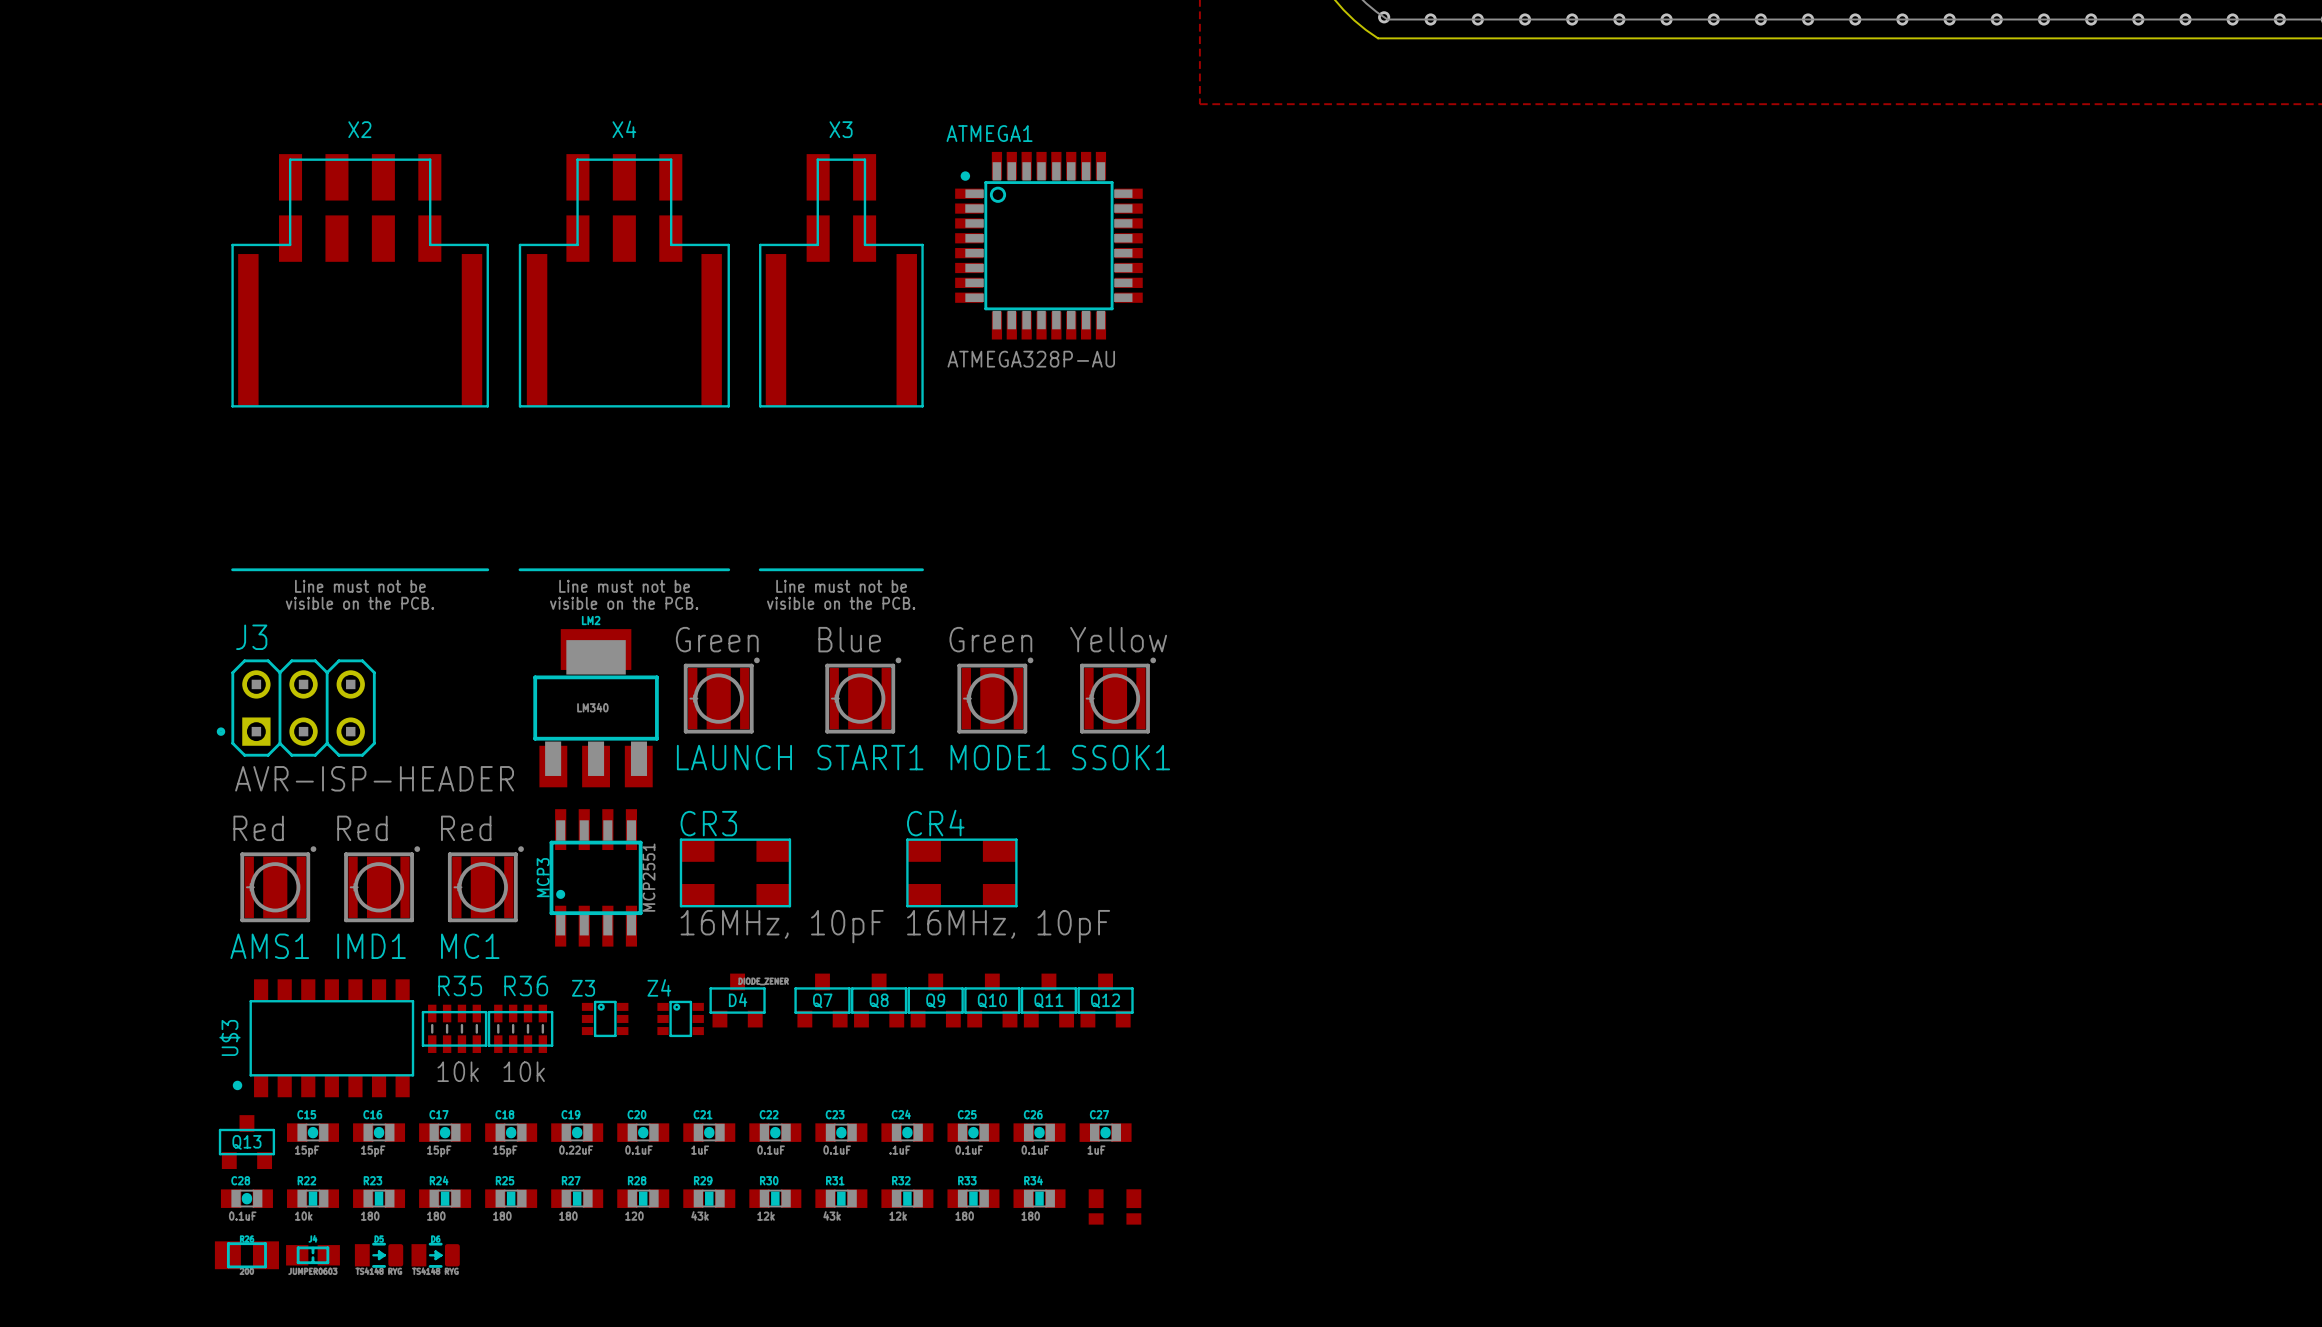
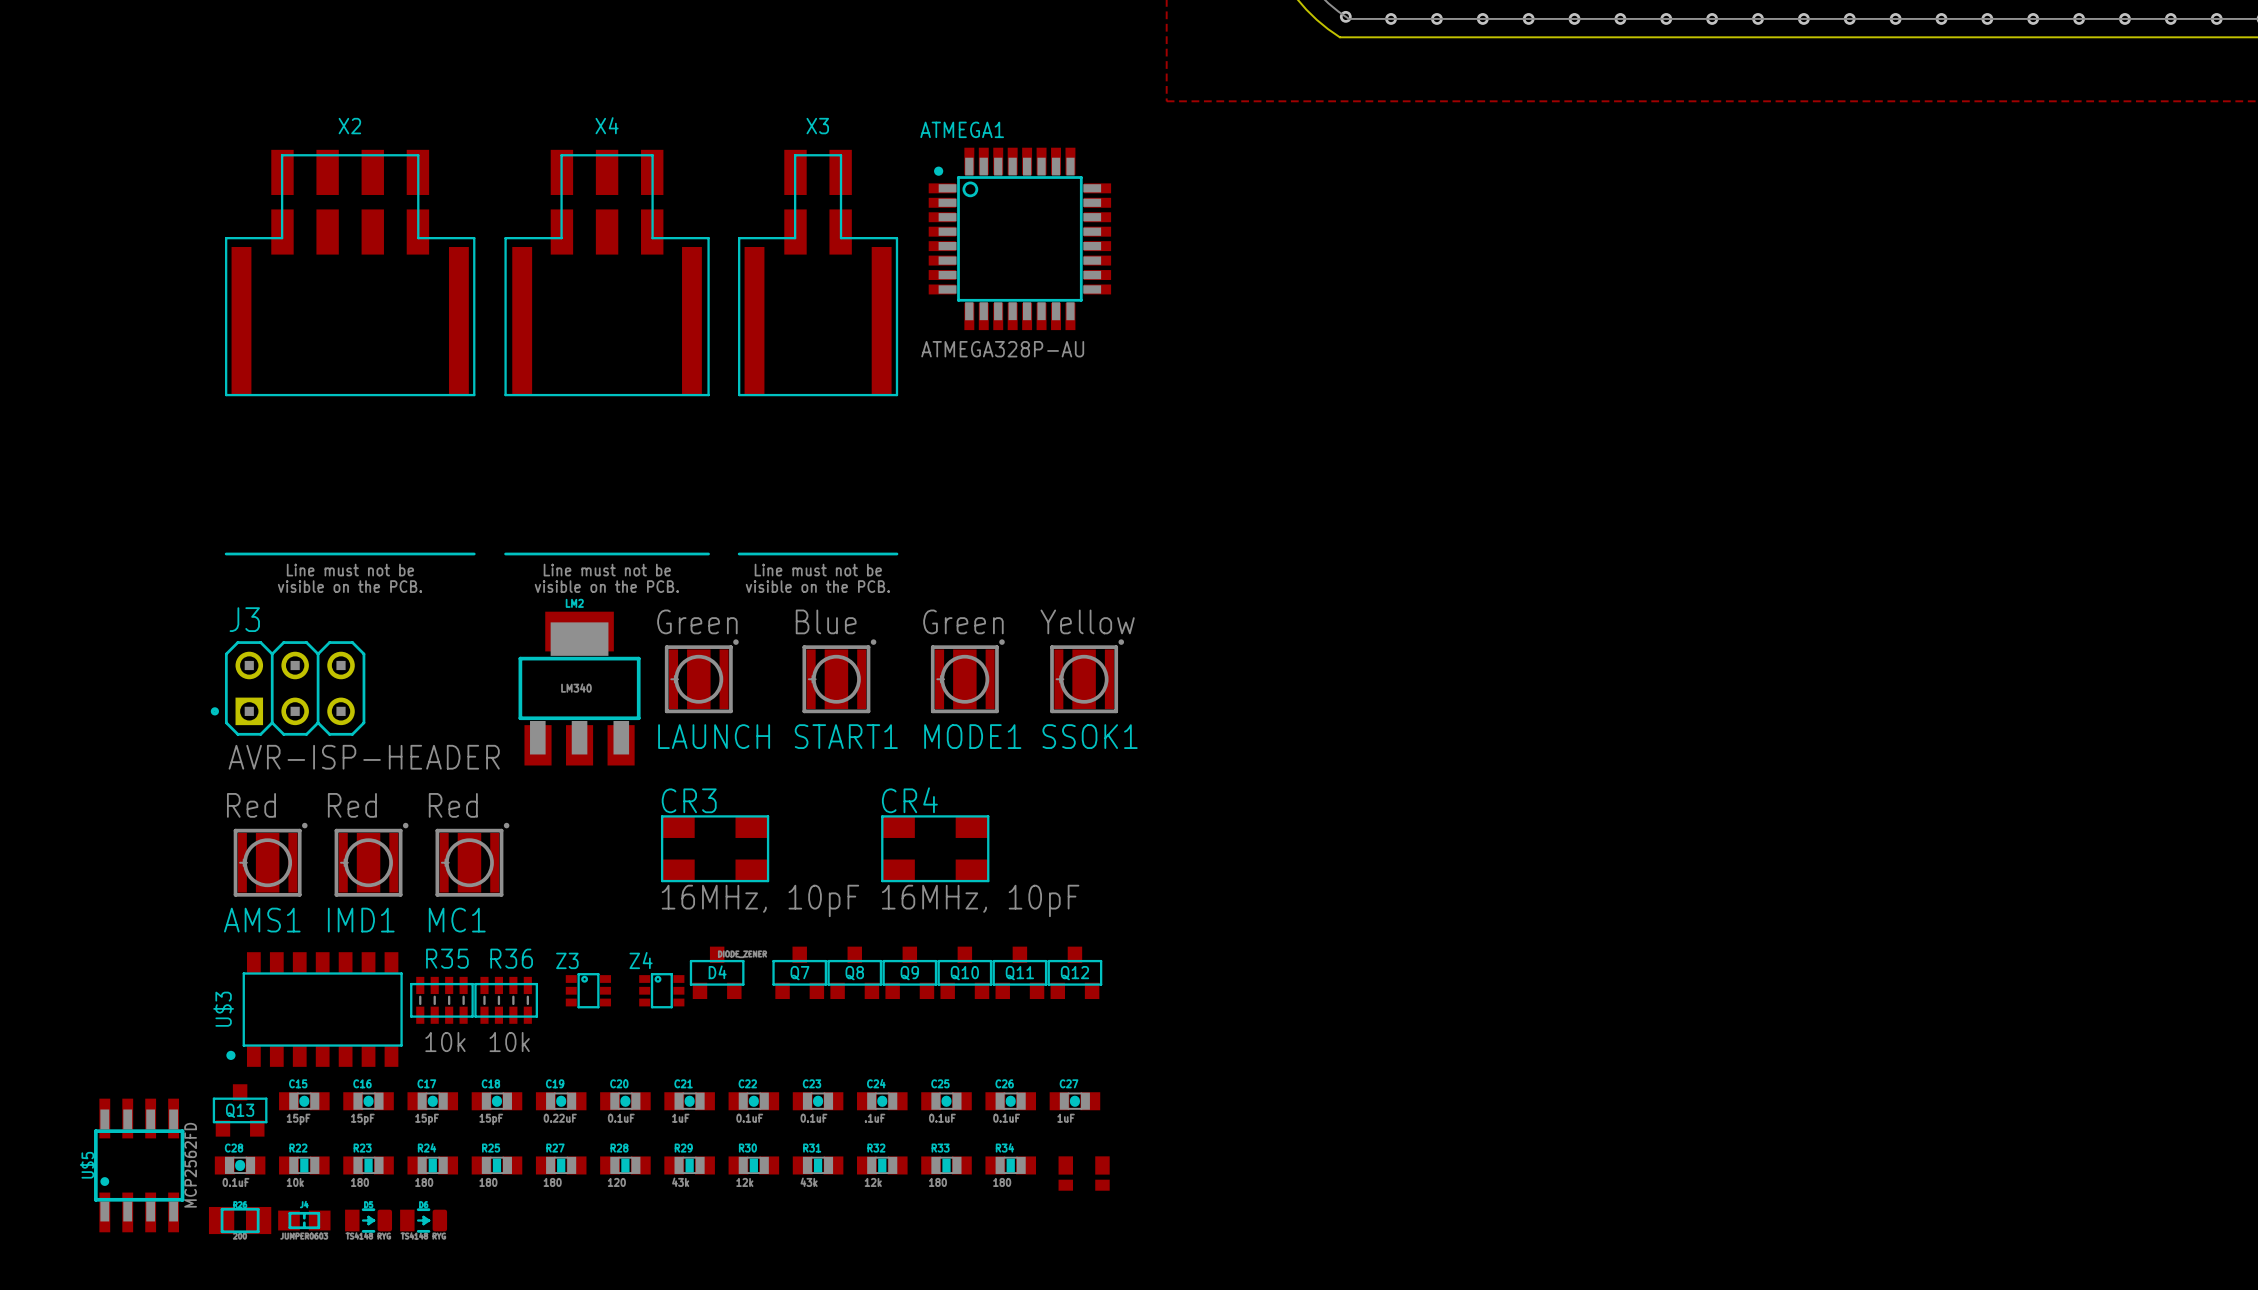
MCP3: MCP2551 (596, 877) -> none
U$5: none -> MCP2562FD (139, 1165)

